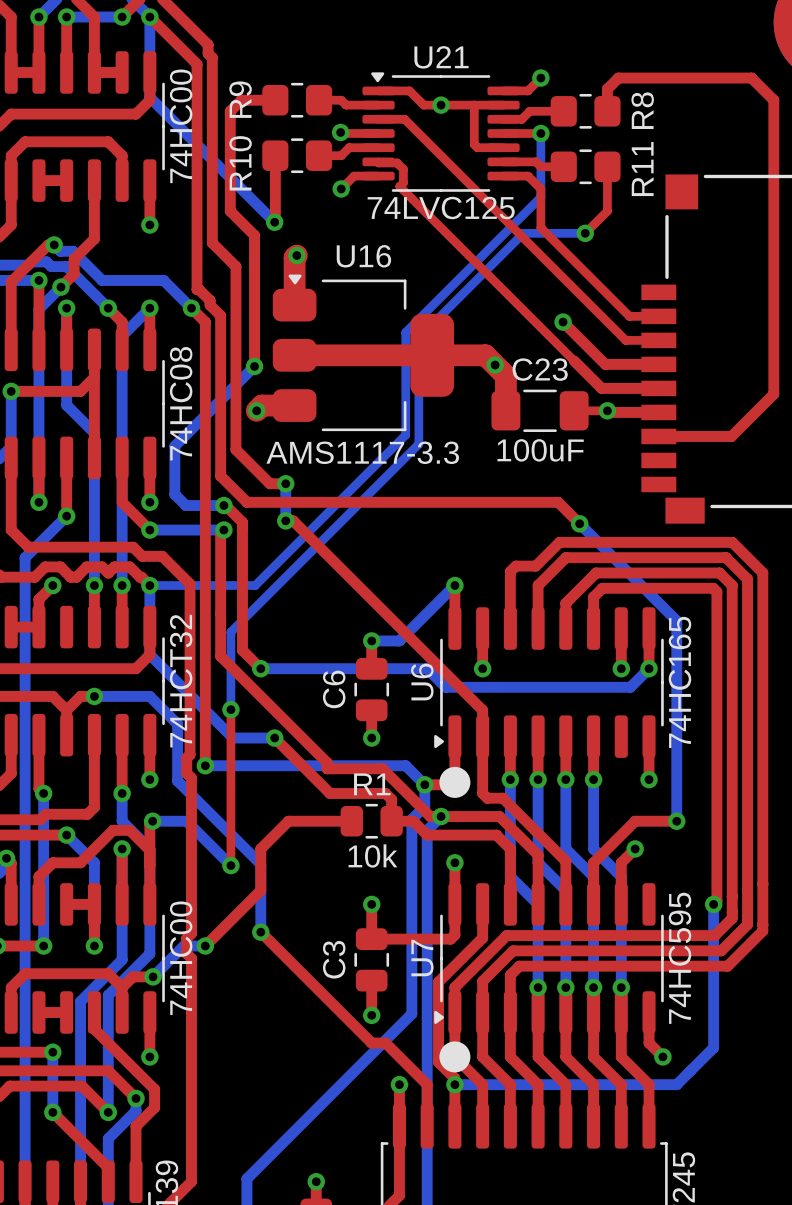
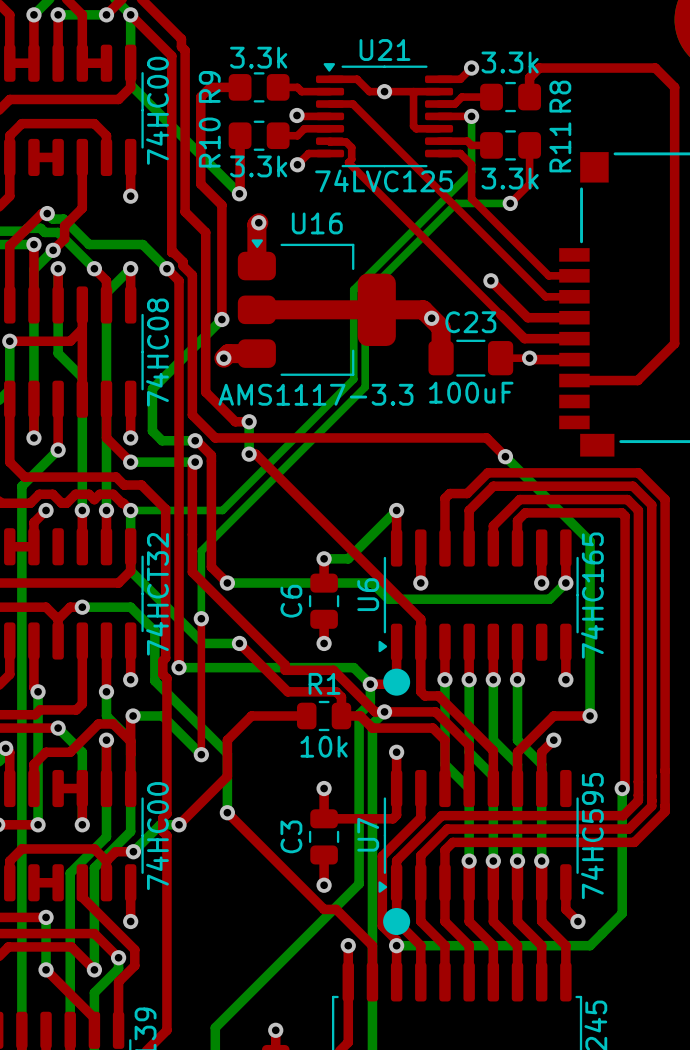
R9 value: none -> 3.3k (258, 57)
R8 value: none -> 3.3k (510, 62)
R10 value: none -> 3.3k (258, 166)
R11 value: none -> 3.3k (510, 178)

